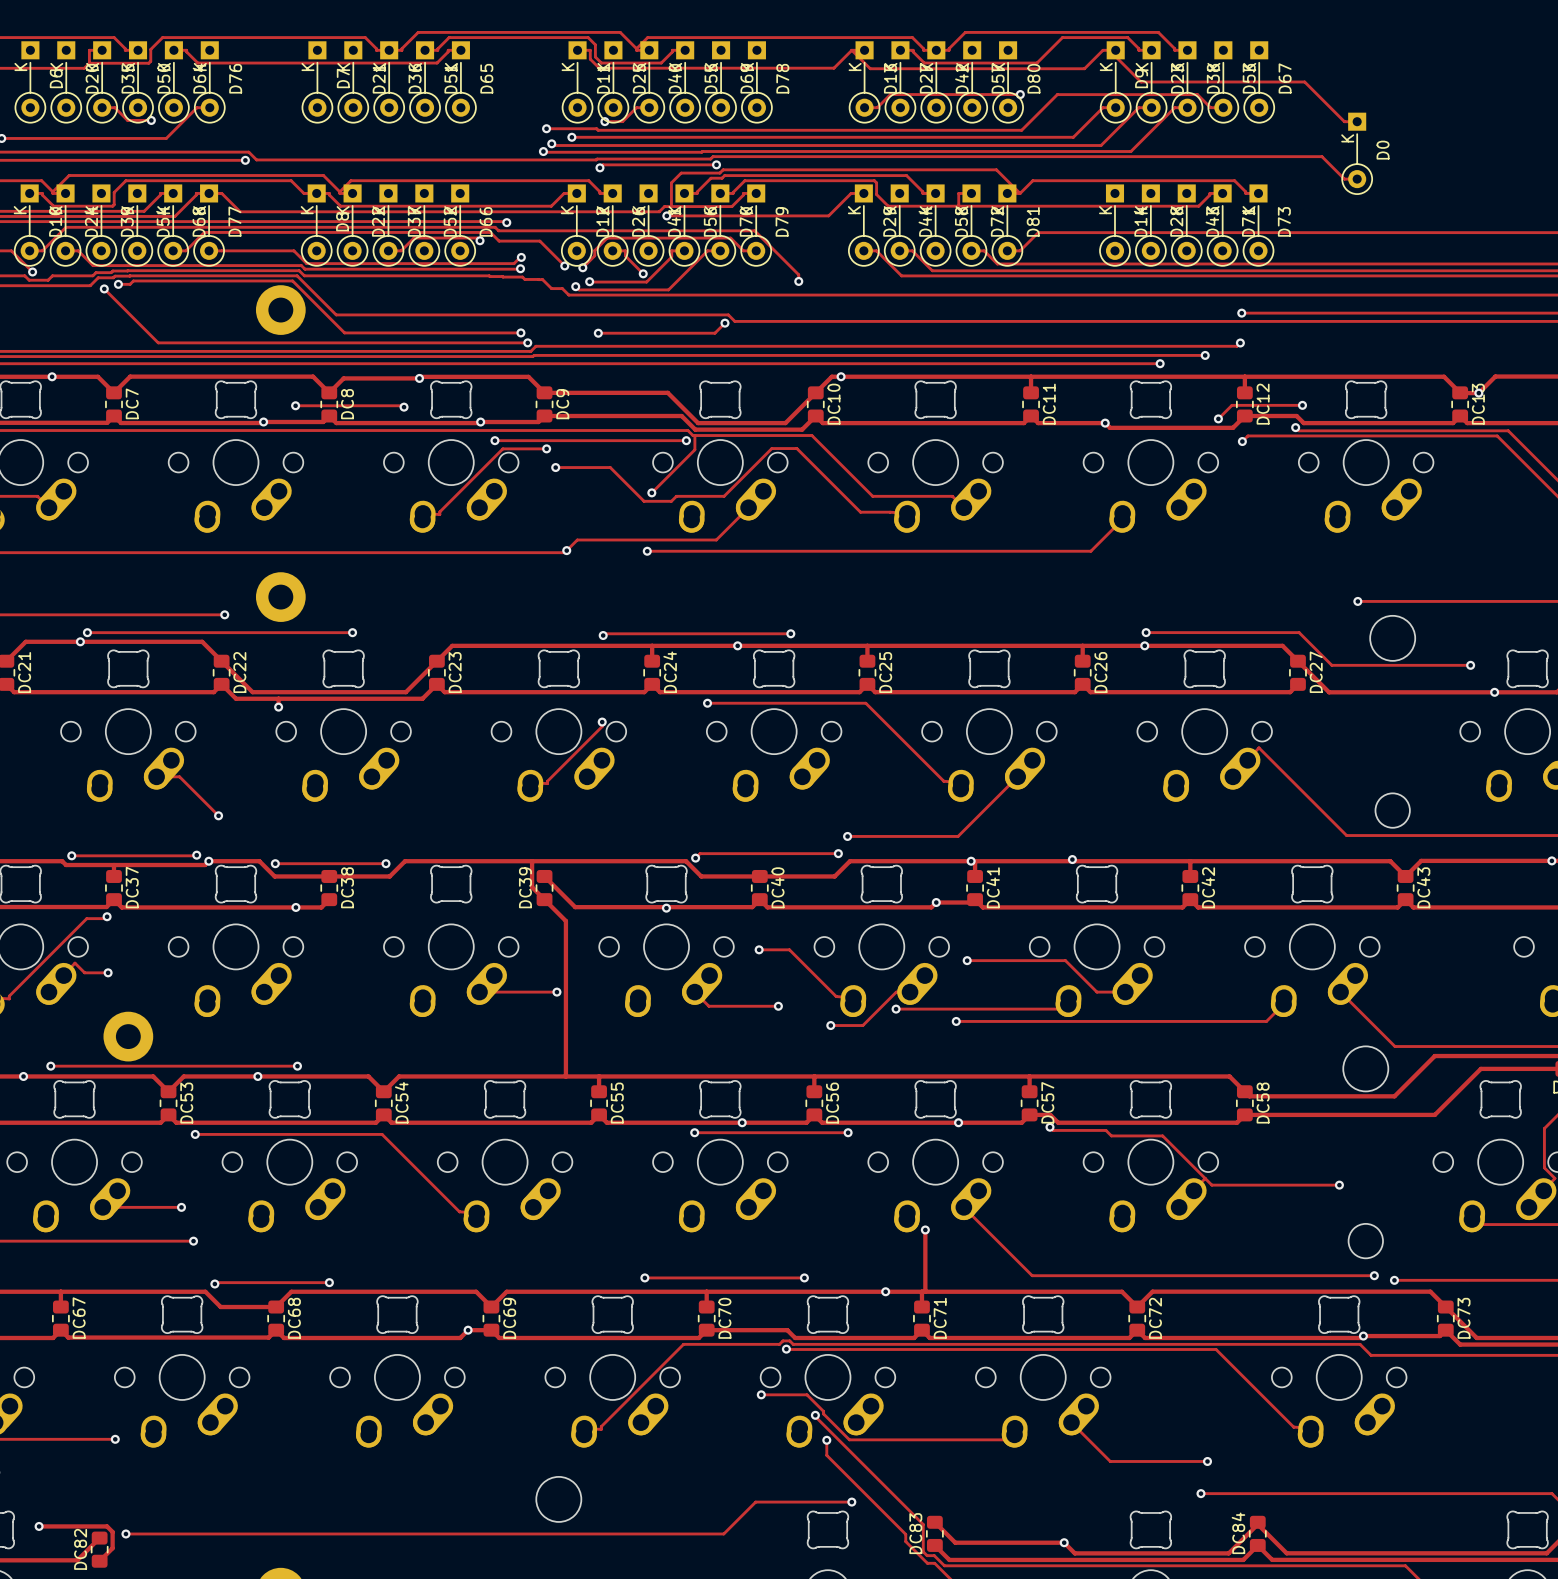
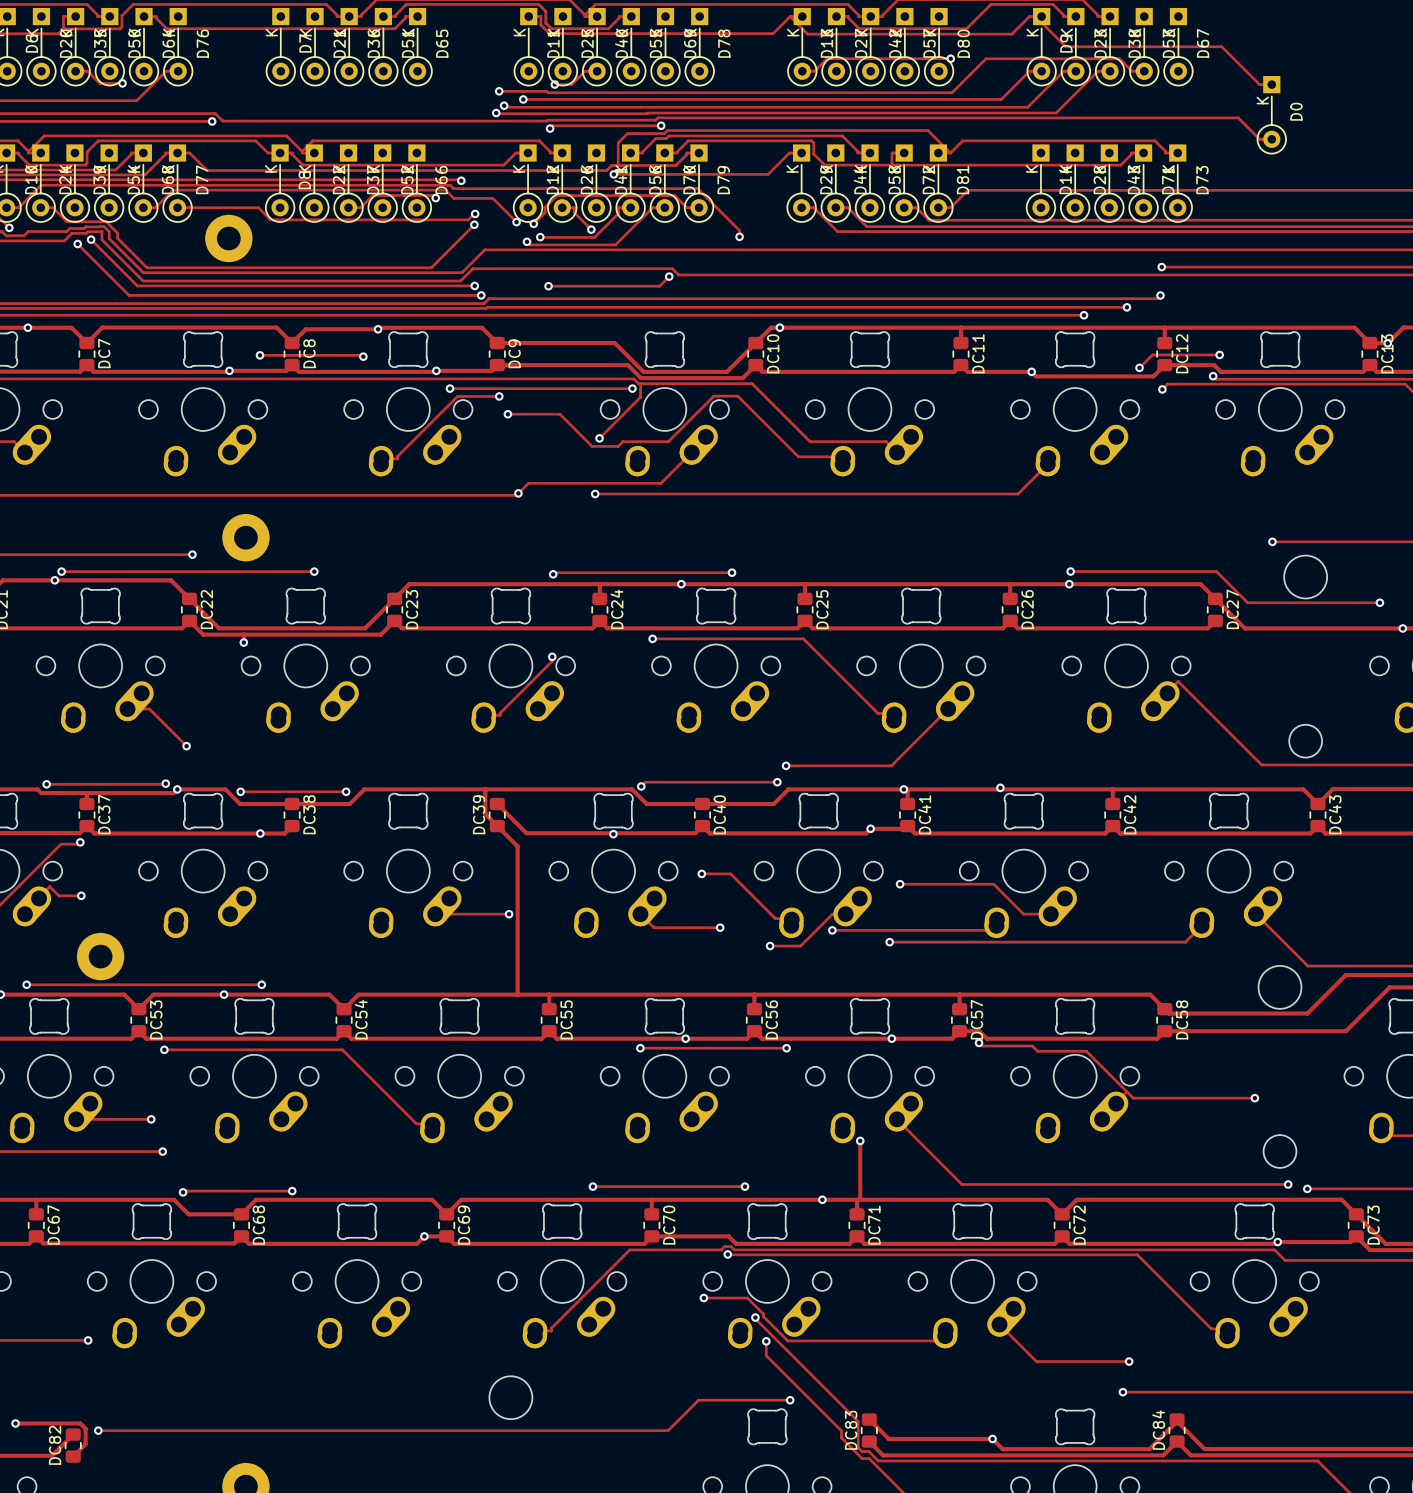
track: (134, 265) (301, 265) (304, 269) (520, 269) -> (106, 221) (117, 233) (117, 238) (147, 267) (431, 267) (473, 225)
track: (132, 270) (299, 270) (304, 275) (522, 277) (524, 279) (542, 279) (551, 288) (562, 288) (568, 295) -> (104, 226) (109, 231) (109, 238) (143, 272) (462, 272) (484, 249) (520, 249)
track: (130, 275) (297, 275) (336, 314) (518, 314) -> (101, 231) (101, 239) (143, 281) (460, 281) (472, 268)
track: (118, 284) (130, 284) (133, 280) (292, 280) (344, 332) -> (91, 239) (137, 285) (306, 285)
part position: (280, 310) -> (228, 238)

